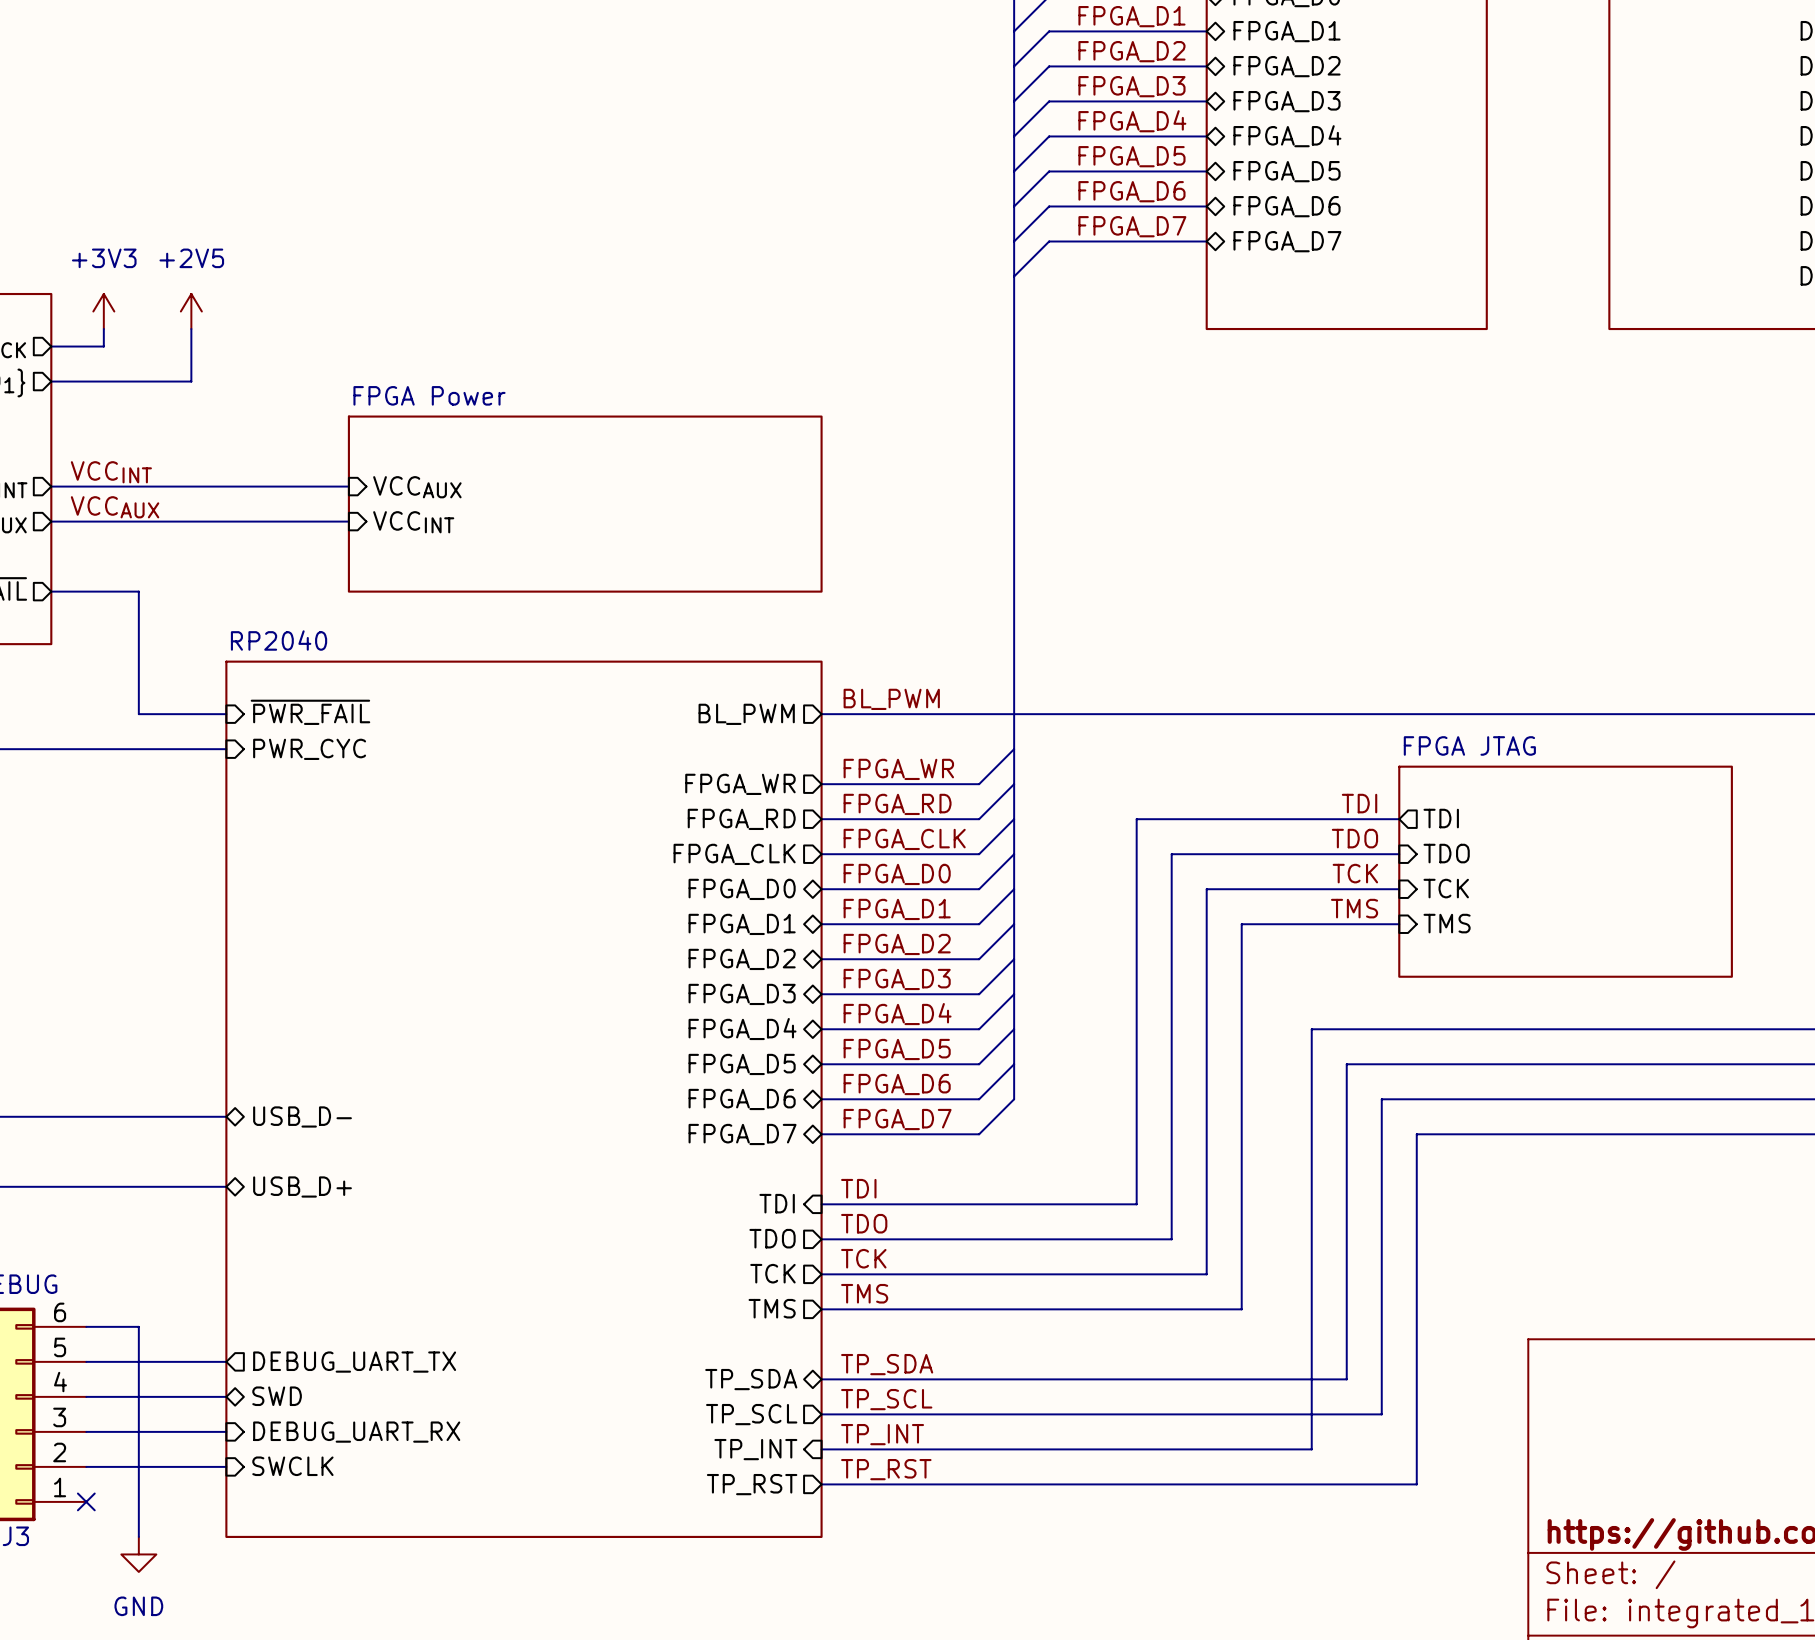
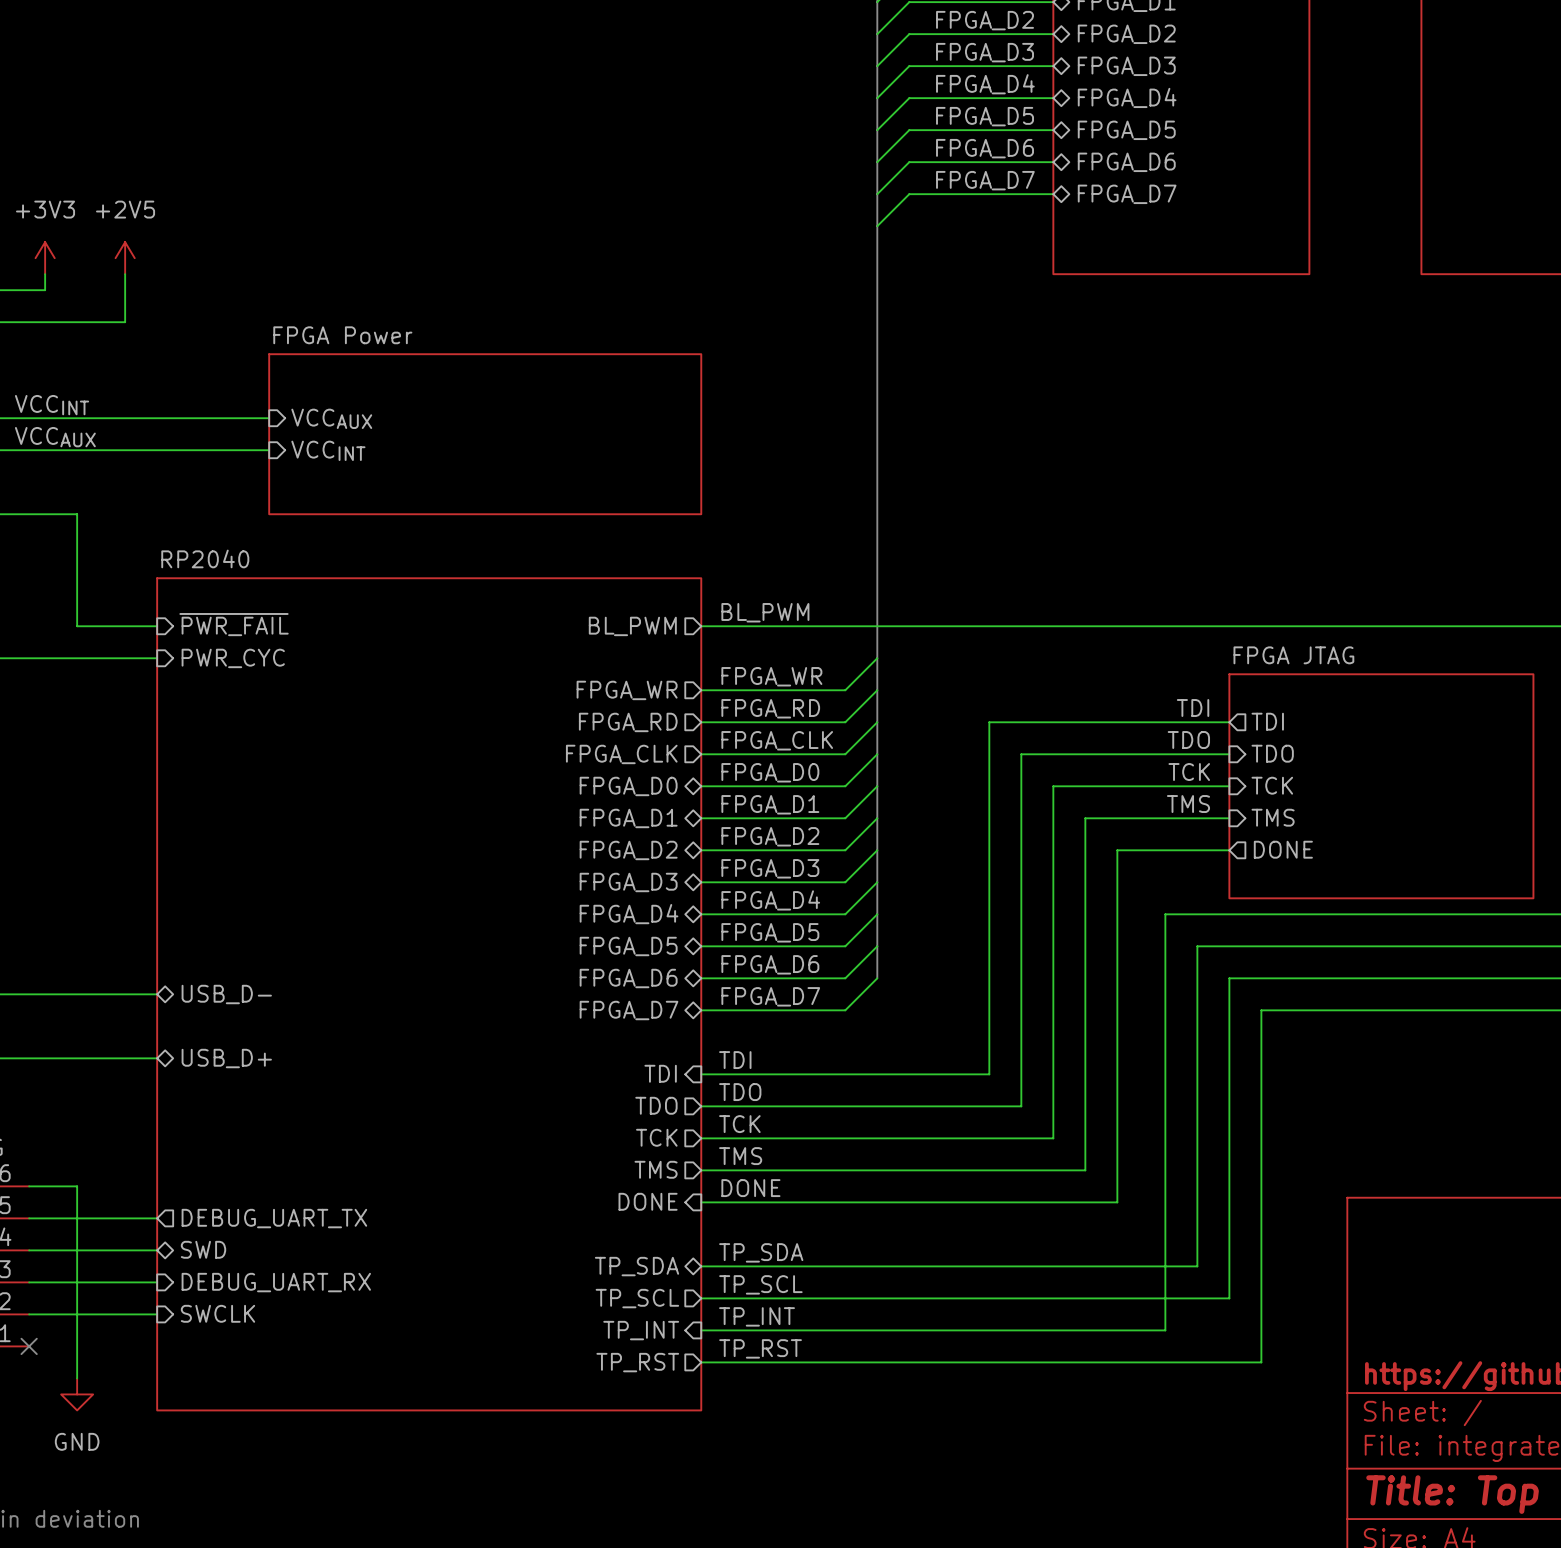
sheet RP2040 shape: [225, 660, 823, 1538] -> [156, 577, 703, 1412]
sheet FPGA JTAG: (1565, 871) -> none
sheet FPGA JTAG: none -> (1381, 786)
sheet pin: none -> DONE (1283, 849)
wire: none -> (1229, 850) (1117, 850) (1117, 1202) (701, 1202)
wire: (1329, 1029) (1311, 1029) (1311, 1449) -> (1165, 914) (1165, 1330)
wire: (1364, 1064) (1346, 1064) (1346, 1379) (821, 1379) -> none
wire: (1399, 1099) (1381, 1099) (1381, 1414) (1364, 1414) -> (1197, 946) (1197, 1266)
wire: none -> (1229, 978) (1229, 1298) (1149, 1298)
wire: (1434, 1134) (1416, 1134) (1416, 1484) (1329, 1484) -> (1261, 1010) (1261, 1362) (701, 1362)
label: none -> DONE (750, 1188)
sheet pin: none -> DONE (648, 1201)
label: TP_SDA (887, 1364) -> none
sheet pin: TP_SDA (751, 1379) -> none
label: TP_SCL (886, 1399) -> TP_SDA (761, 1252)
sheet pin shape: output (751, 1414) -> bidirectional (637, 1266)
sheet pin: TP_SCL (751, 1414) -> TP_SDA (637, 1266)
label: TP_INT (882, 1434) -> TP_SCL (760, 1284)
sheet pin shape: input (755, 1449) -> output (637, 1298)
sheet pin: TP_INT (755, 1449) -> TP_SCL (637, 1298)
label: TP_RST (886, 1469) -> TP_INT (757, 1316)
sheet pin shape: output (752, 1484) -> input (641, 1330)
sheet pin: TP_RST (752, 1484) -> TP_INT (641, 1330)
label: none -> TP_RST (760, 1348)
sheet pin: none -> TP_RST (637, 1362)

